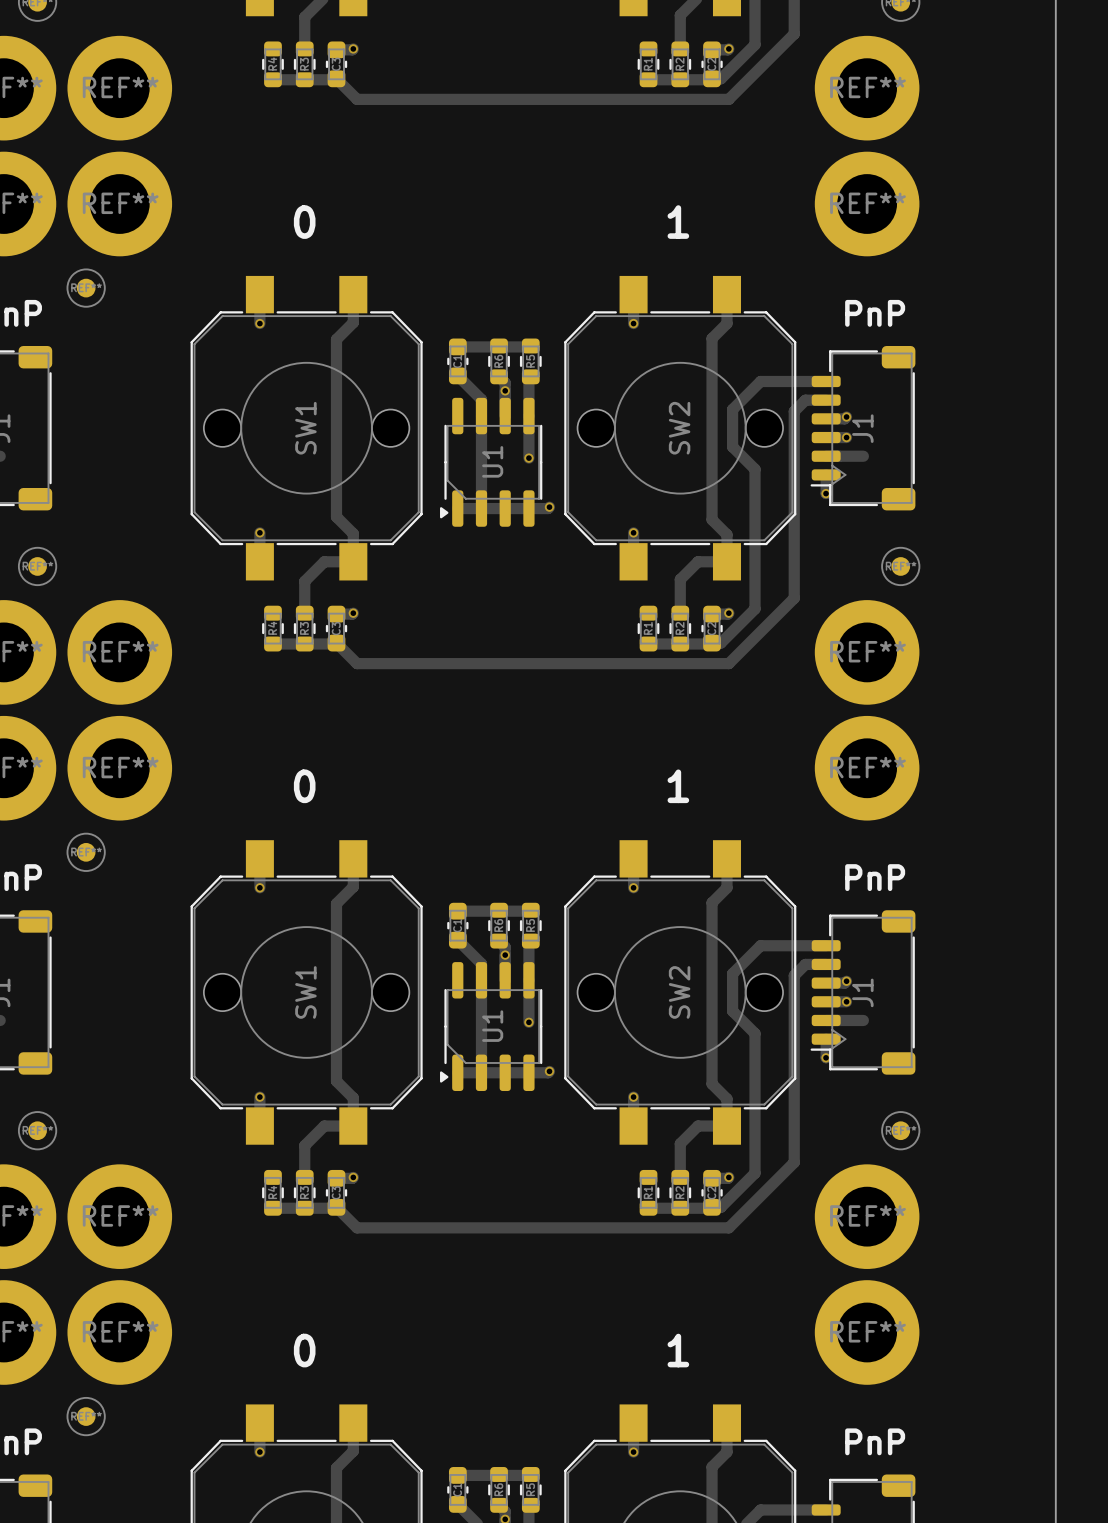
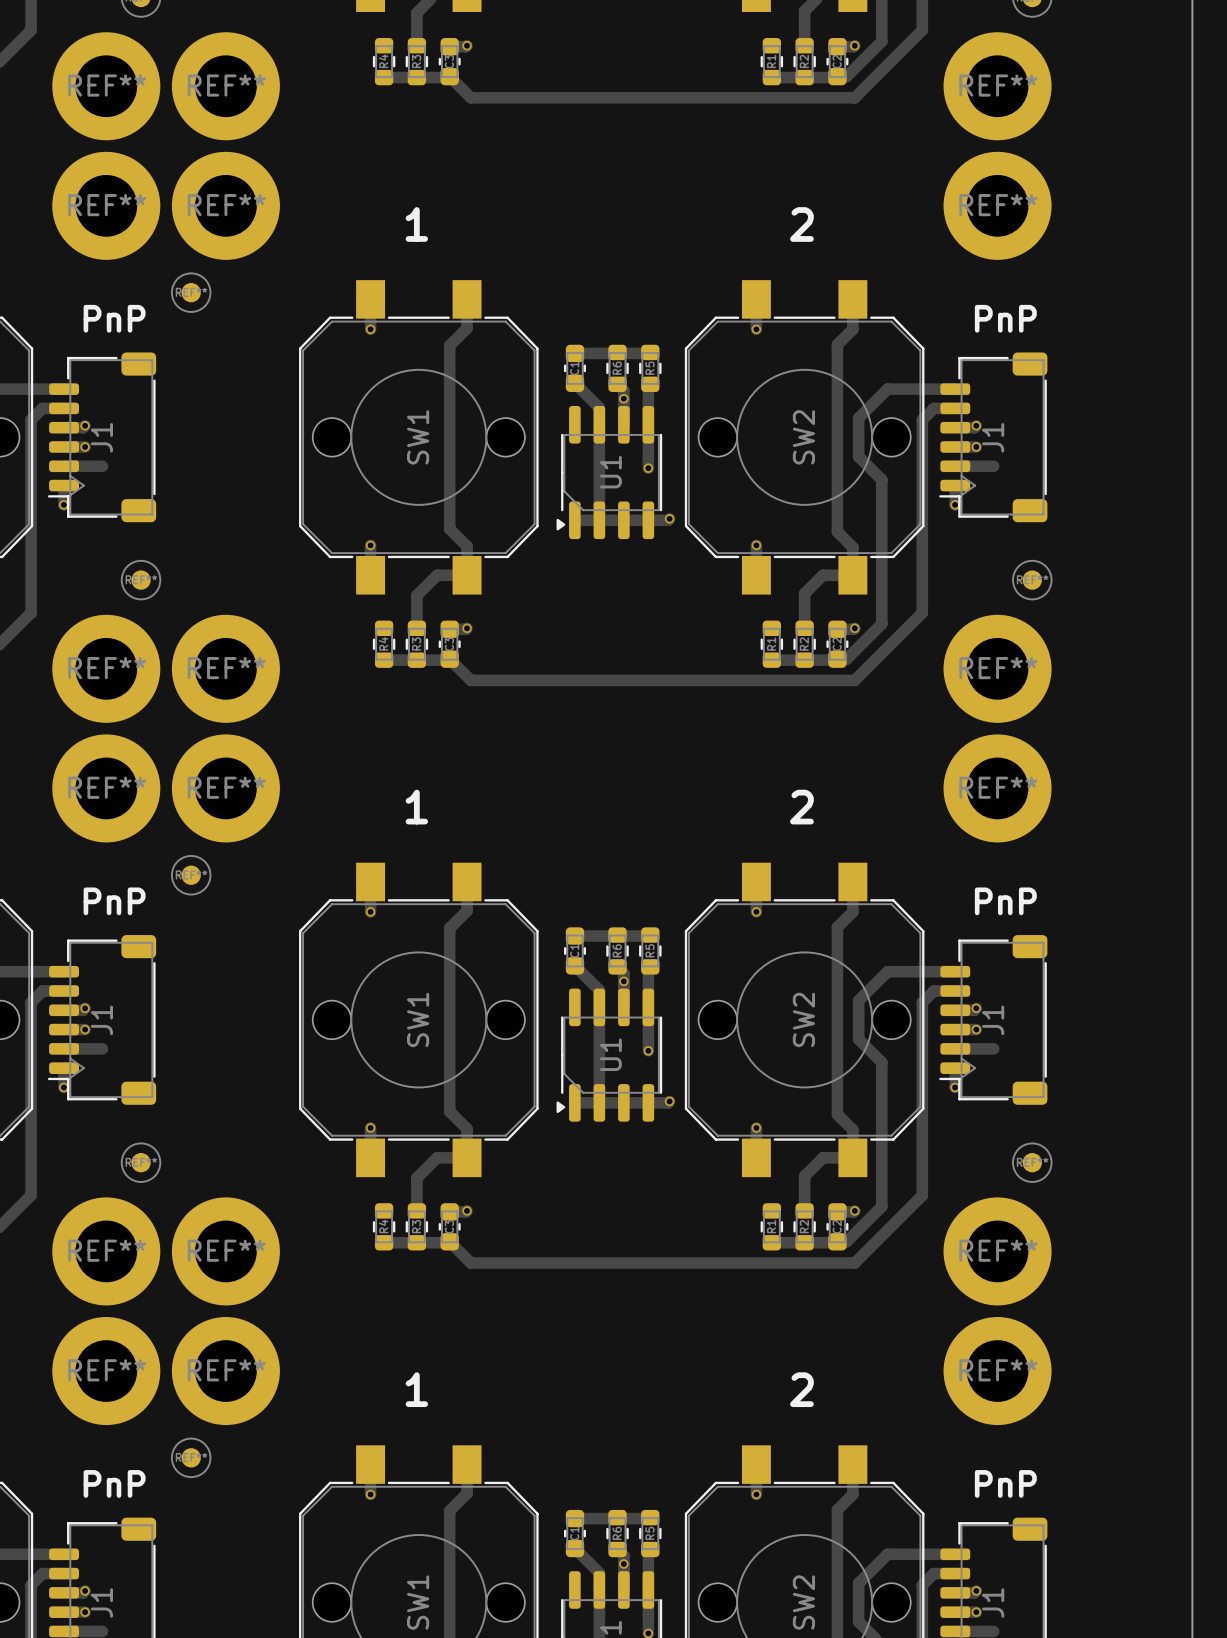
text: 0 (304, 222) -> 1 (416, 224)
text: 1 (678, 222) -> 2 (801, 224)
text: 0 (304, 786) -> 1 (416, 807)
text: 1 (678, 786) -> 2 (801, 807)
text: 0 (304, 1350) -> 1 (416, 1389)
text: 1 (678, 1350) -> 2 (801, 1389)

